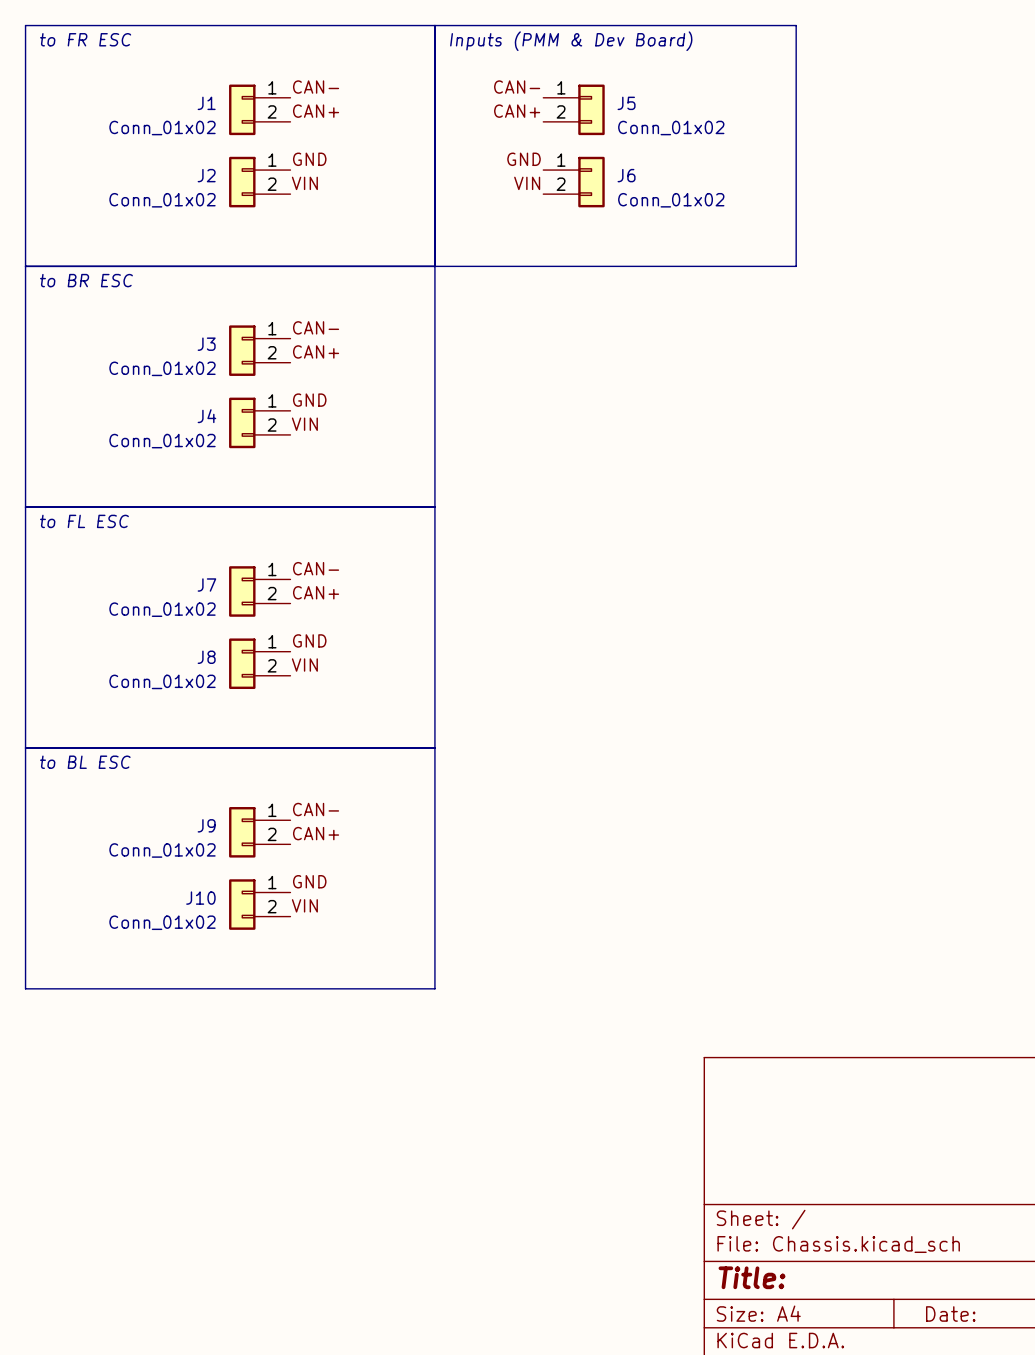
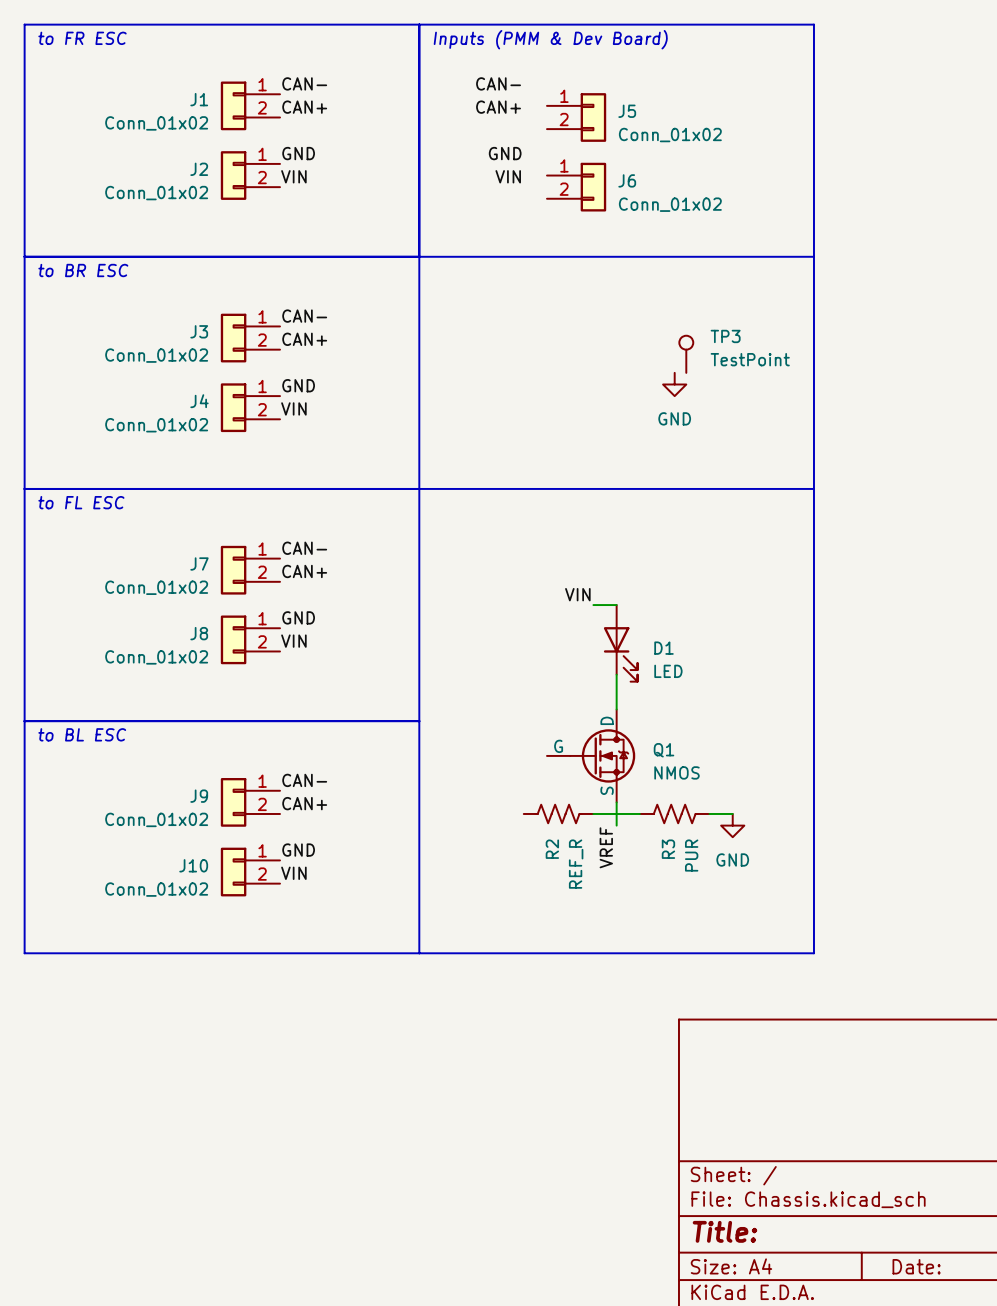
line: (796, 25) (796, 266) -> (813, 256) (767, 256)
line: none -> (767, 24) (813, 24) (813, 953) (419, 953)
J5 position: (574, 109) -> (576, 117)
J6 position: (574, 182) -> (576, 187)
TP3: none -> TestPoint (686, 354)
power symbol: none -> GND (674, 384)
line: none -> (419, 488) (813, 488)
label: none -> VIN (577, 594)
wire: none -> (593, 605) (616, 605)
D1: none -> LED (620, 643)
wire: none -> (616, 674) (616, 709)
Q1: none -> NMOS (591, 755)
wire: none -> (616, 802) (616, 825)
R2: none -> REF_R (558, 813)
wire: none -> (593, 813) (639, 813)
R3: none -> PUR (674, 813)
wire: none -> (709, 813) (732, 813)
power symbol: none -> GND (732, 825)
label: none -> VREF (606, 847)

